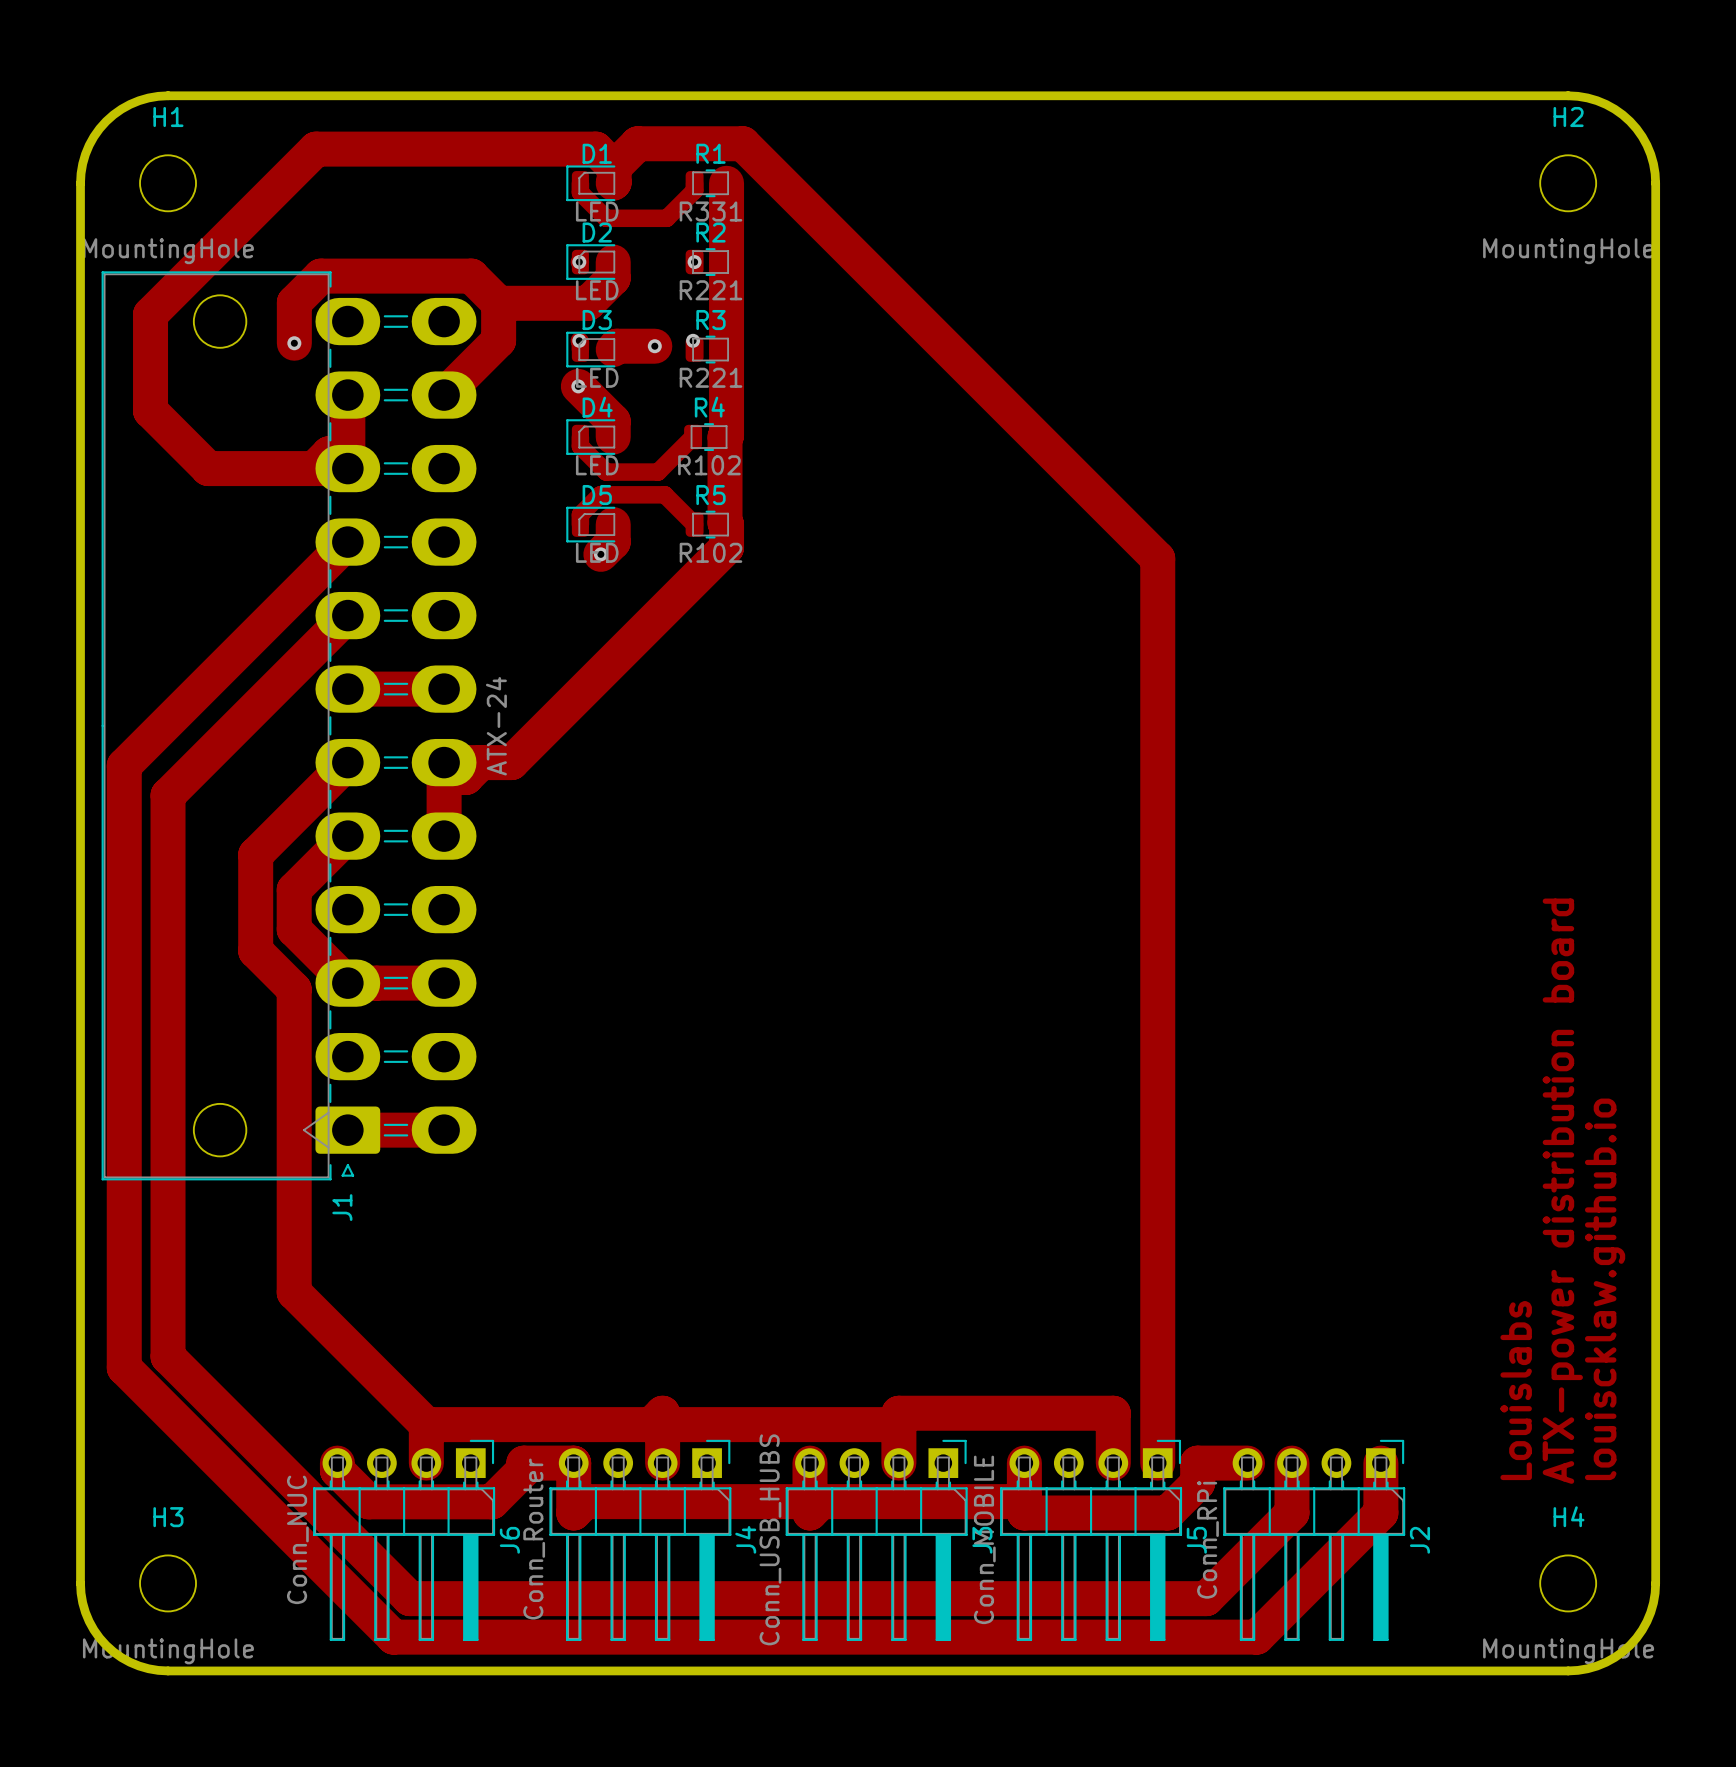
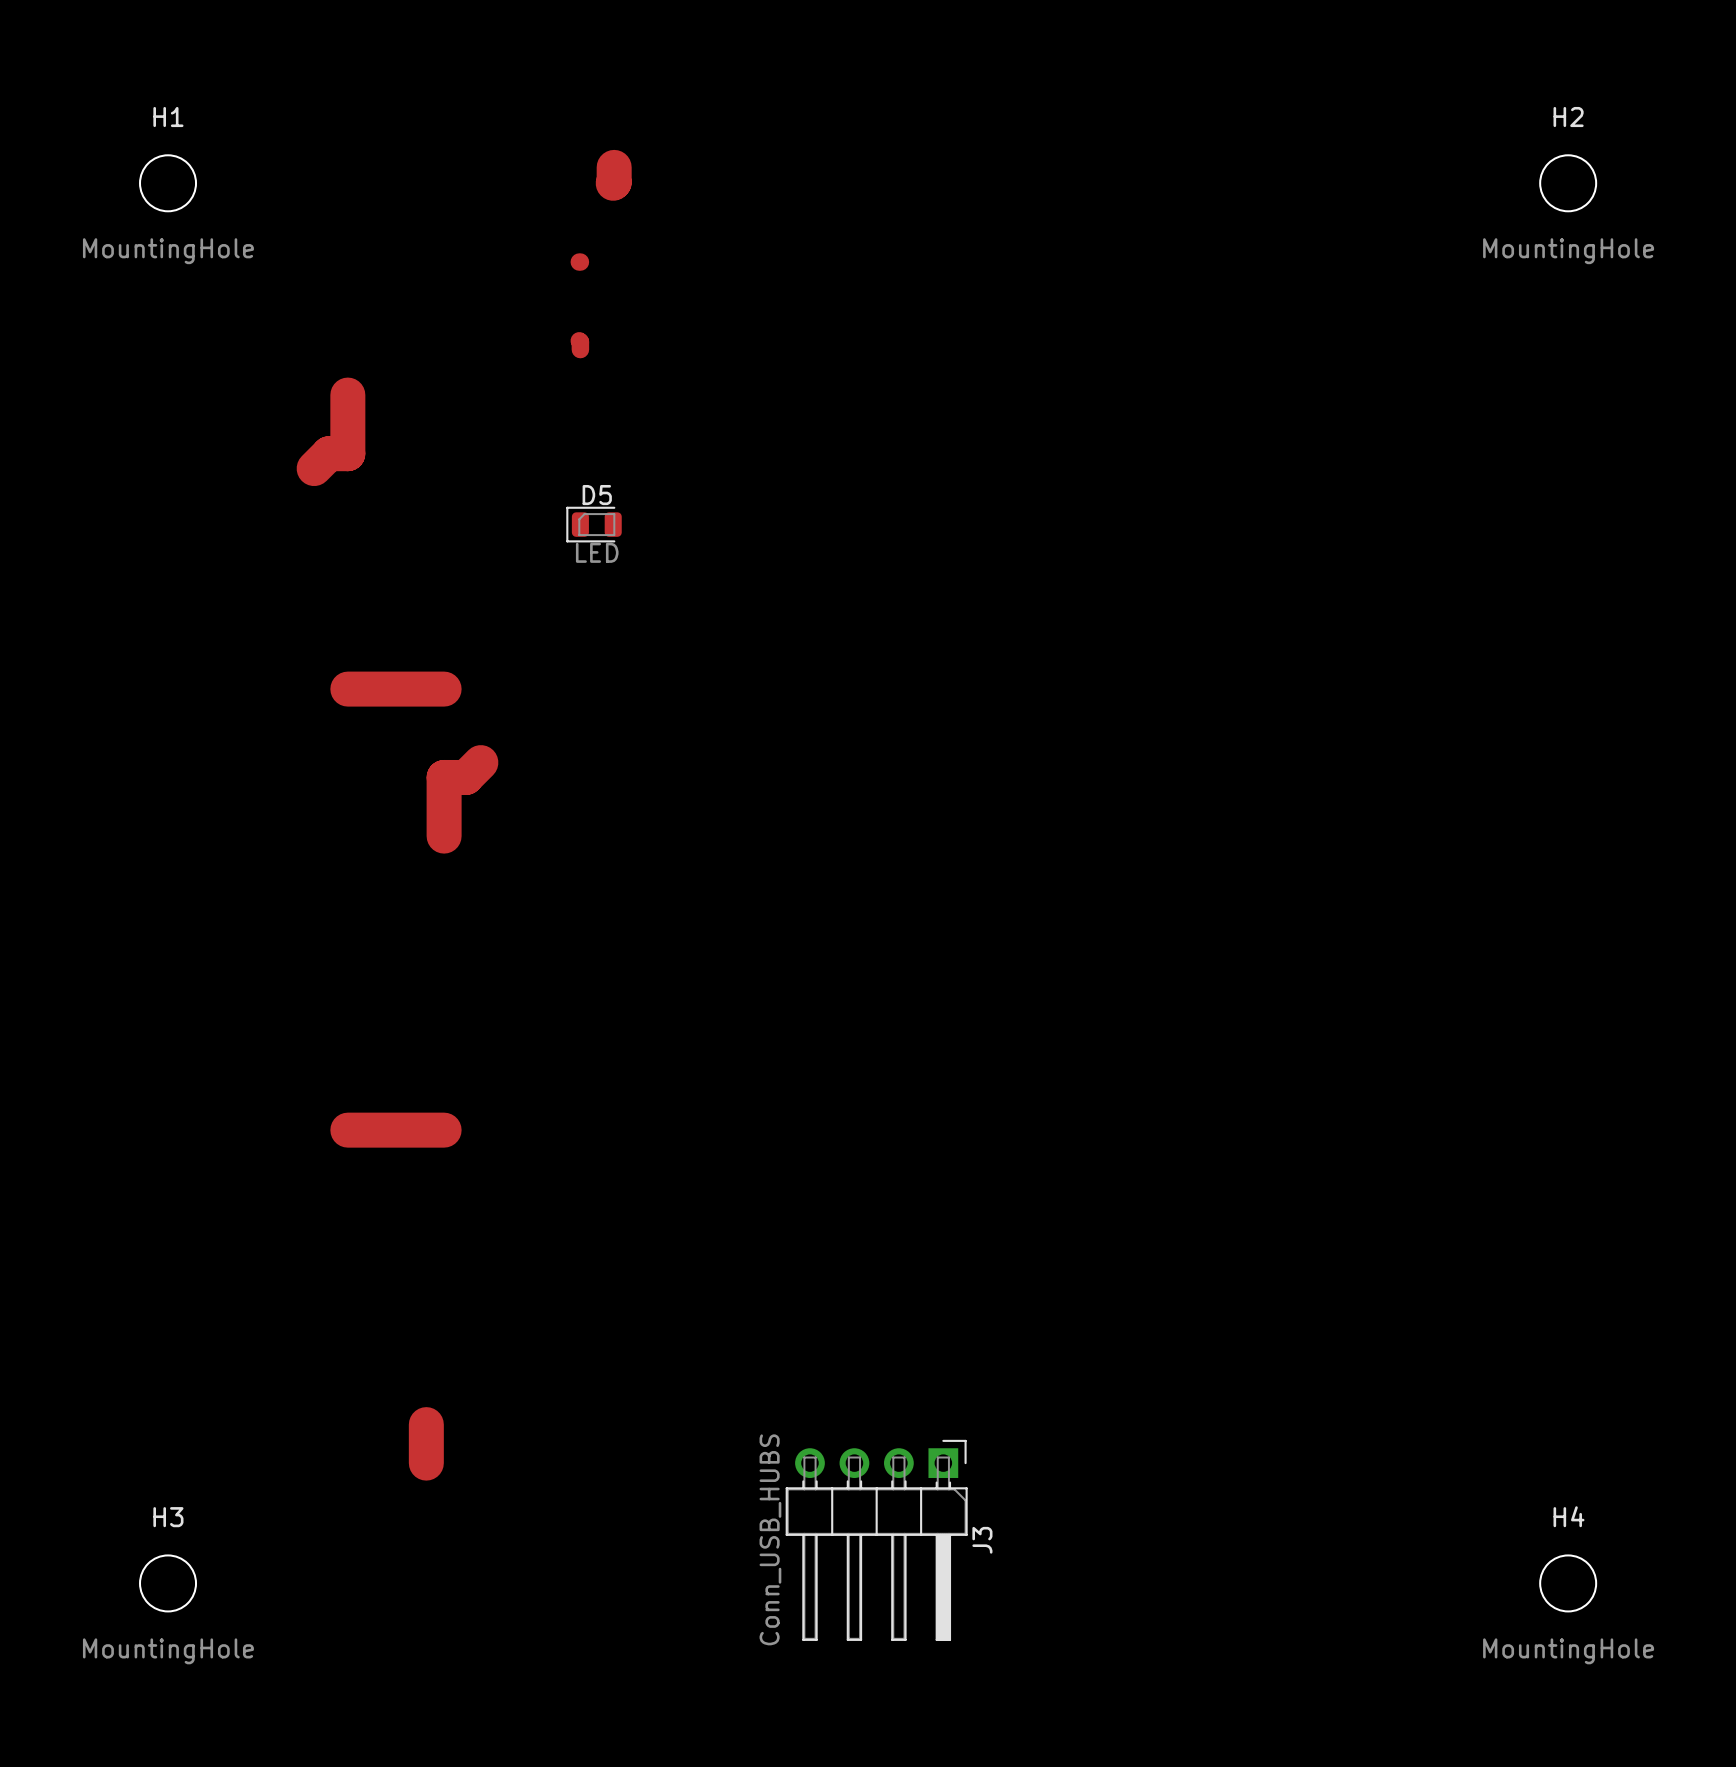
board edge: (168, 95) (1568, 95) (1587, 97) (1606, 104) (1630, 121) (1642, 136) (1650, 154) (1655, 183) (1655, 1583) (1650, 1612) (1642, 1629) (1630, 1645) (1614, 1657) (1597, 1666) (1568, 1670) (168, 1670) (148, 1668) (130, 1662) (106, 1645) (89, 1621) (82, 1602) (80, 1583) (80, 183) (82, 163) (89, 145) (106, 121) (121, 109) (139, 100) (168, 95) -> none
track: (580, 183) (580, 192) (606, 218) (666, 218) (694, 190) (694, 183) -> none
D1: LED (594, 183) -> none
R1: R331 (710, 183) -> none
track: (726, 183) (726, 435) (725, 437) (726, 547) (511, 762) (444, 762) -> none
via: (579, 262) -> none
D2: LED (594, 262) -> none
track: (613, 262) (613, 278) (588, 303) (498, 303) -> none
via: (694, 262) -> none
R2: R221 (710, 262) -> none
track: (498, 303) (498, 340) (444, 395) -> none
track: (498, 303) (471, 276) (320, 276) (294, 302) (294, 343) -> none
via: (579, 340) -> none
via: (693, 340) -> none
via: (294, 343) -> none
track: (654, 346) (616, 346) (613, 349) -> none
via: (654, 346) -> none
D3: LED (594, 349) -> none
R3: R221 (710, 349) -> none
track: (578, 386) (613, 421) (613, 437) -> none
via: (578, 386) -> none
track: (580, 437) (580, 446) (606, 472) (658, 472) (693, 437) -> none
D4: LED (594, 437) -> none
R4: R102 (709, 437) -> none
track: (347, 468) (208, 468) (150, 410) (150, 314) (315, 149) (595, 149) (614, 167) (637, 143) (742, 143) (1157, 558) (1157, 1463) -> none
track: (580, 524) (580, 514) (600, 494) (664, 494) (694, 524) -> none
track: (613, 524) (613, 542) (600, 554) -> none
R5: R102 (710, 524) -> none
track: (347, 542) (124, 765) (124, 1367) (393, 1637) (1256, 1637) (1380, 1512) (1380, 1463) -> none
via: (600, 554) -> none
track: (347, 615) (168, 795) (168, 1356) (409, 1598) (1206, 1598) (1291, 1512) (1291, 1463) -> none
J1: ATX-24 (289, 725) -> none
track: (347, 762) (255, 854) (255, 950) (294, 989) (294, 1292) (426, 1424) (651, 1424) (662, 1413) (662, 1463) -> none
track: (347, 836) (294, 889) (294, 929) (347, 983) (444, 983) -> none
text: ATX-power distribution board (1562, 1191) -> none
text: louiscklaw.github.io (1605, 1289) -> none
text: Louislabs (1516, 1390) -> none
track: (662, 1424) (898, 1424) -> none
track: (337, 1463) (337, 1470) (368, 1501) (491, 1501) (523, 1470) (523, 1463) (573, 1463) (573, 1512) (585, 1501) (809, 1501) -> none
track: (809, 1463) (809, 1512) (821, 1501) (1024, 1501) -> none
track: (898, 1463) (898, 1413) (1113, 1413) (1113, 1463) -> none
track: (1024, 1463) (1024, 1512) (1167, 1512) (1197, 1483) (1197, 1463) (1247, 1463) -> none
J6: Conn_NUC (404, 1540) -> none
J4: Conn_Router (640, 1540) -> none
J5: Conn_MOBILE (1091, 1540) -> none
J2: Conn_RPi (1314, 1540) -> none

